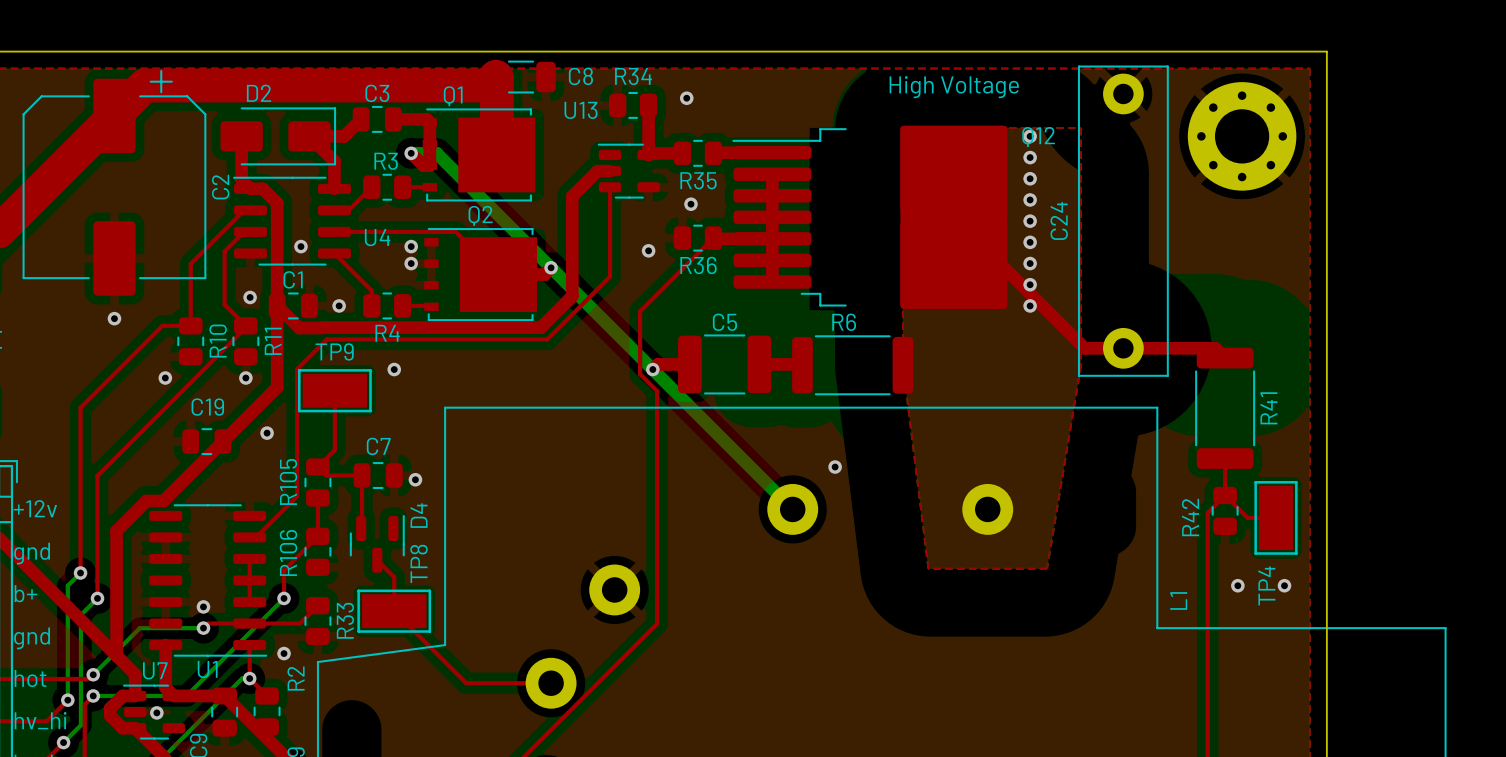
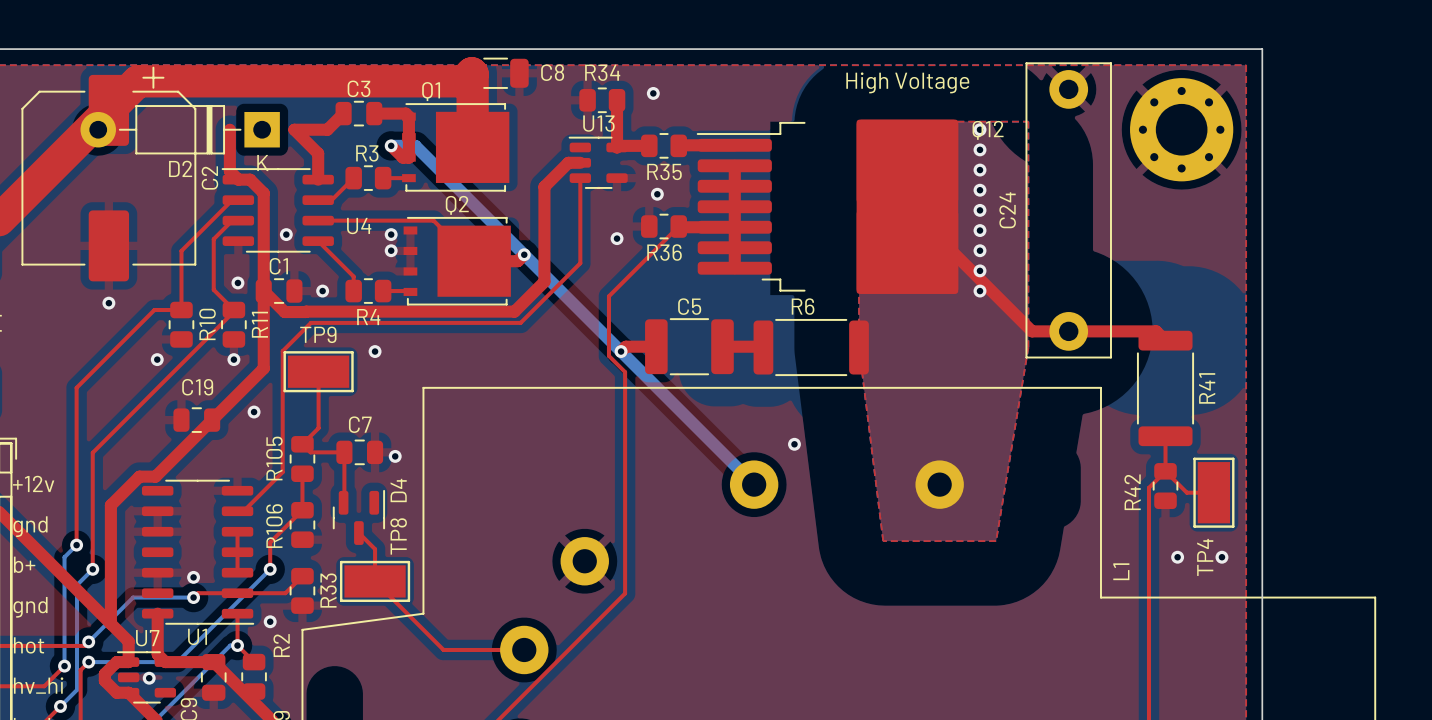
D2 name position: D2 (259, 93) -> D2 (180, 168)
D2 footprint: [220, 107, 337, 166] -> [80, 105, 280, 155]
U13 name position: U13 (581, 110) -> U13 (598, 123)

